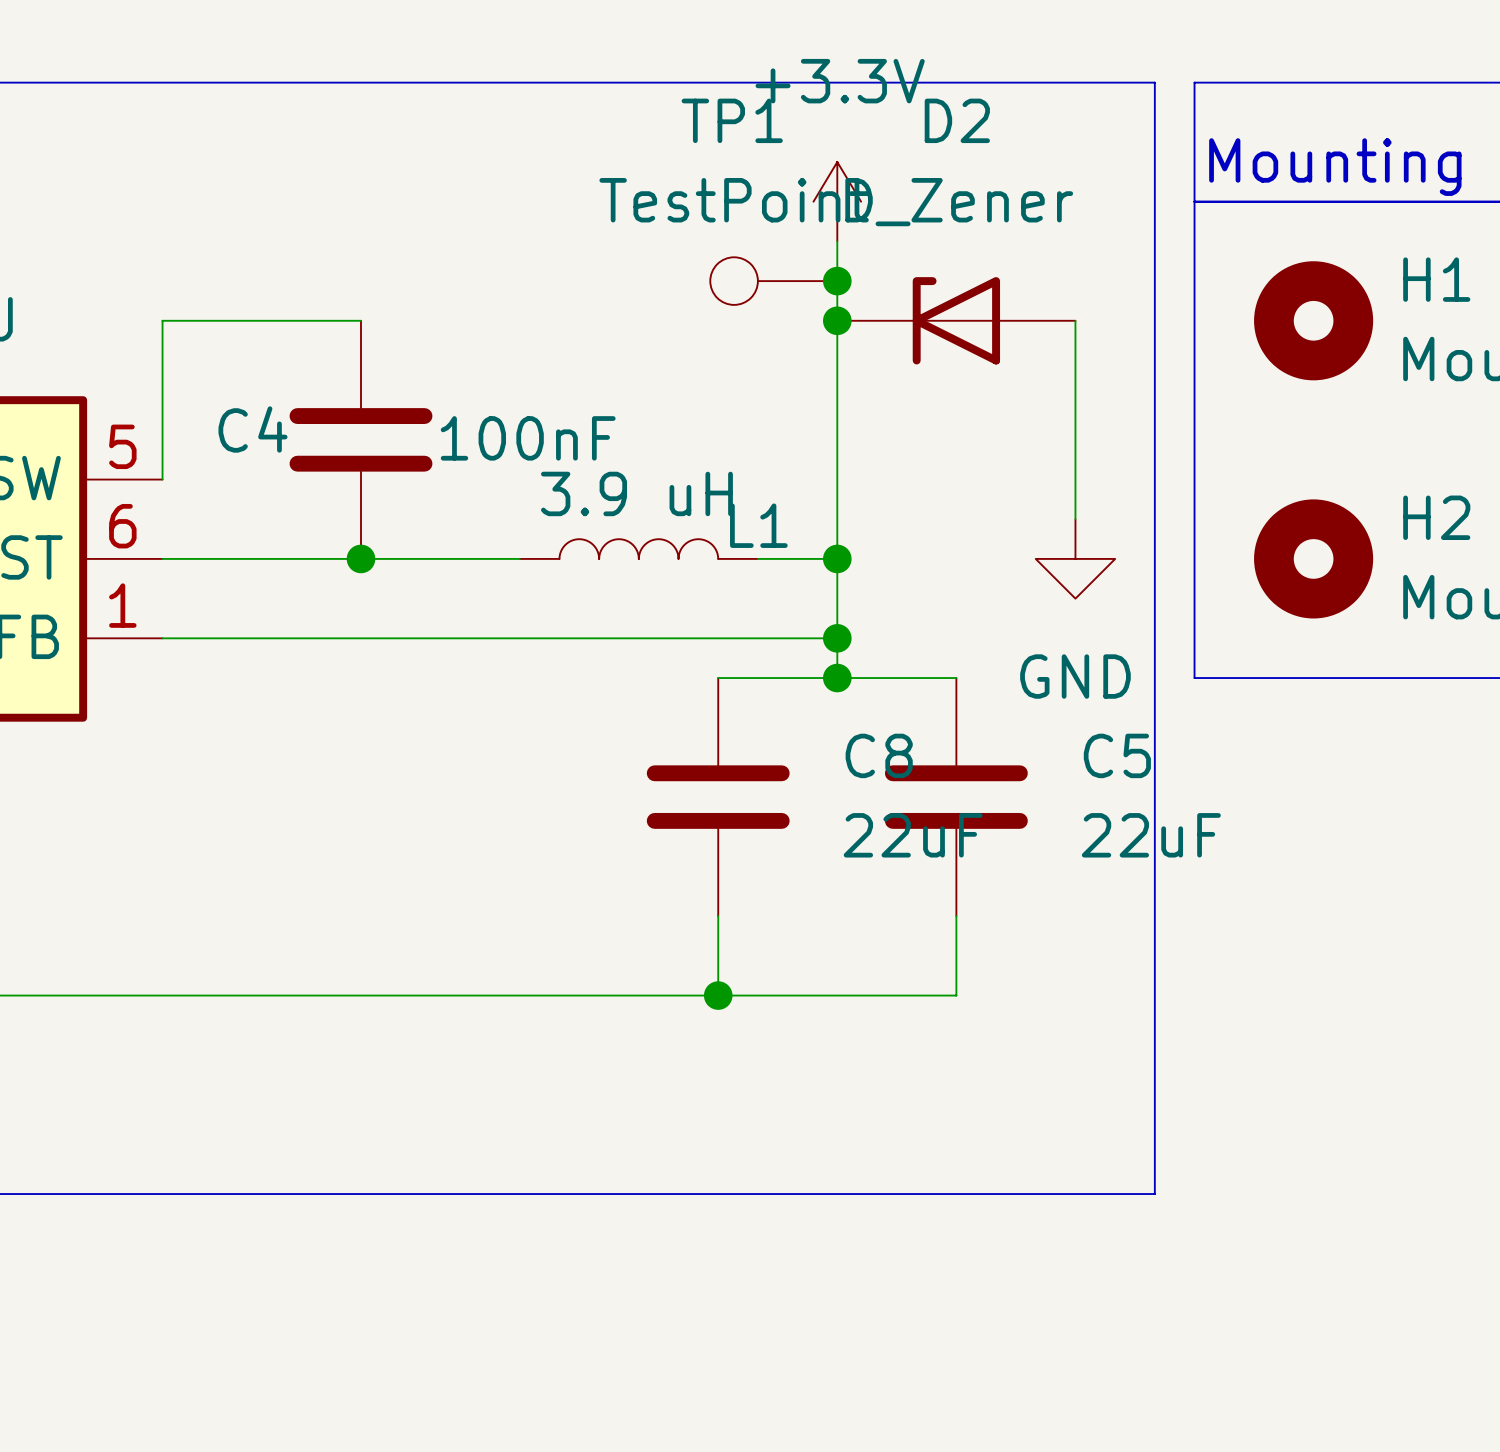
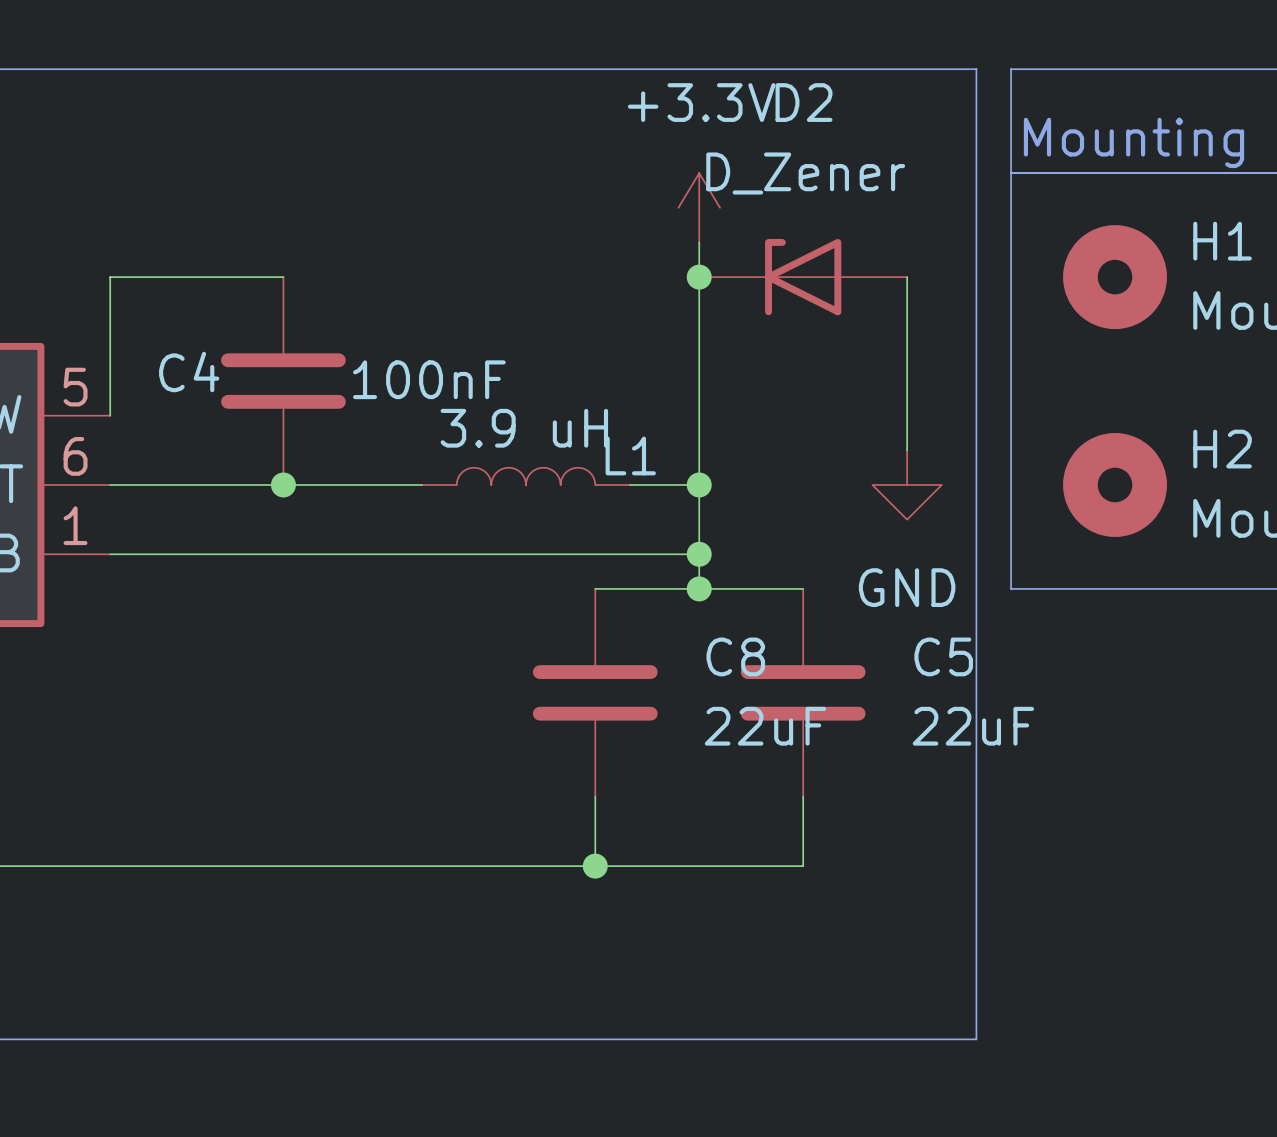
power symbol position: +3.3V (837, 201) -> +3.3V (699, 207)
TP1: TestPoint (773, 281) -> none
junction: (837, 281) -> none

